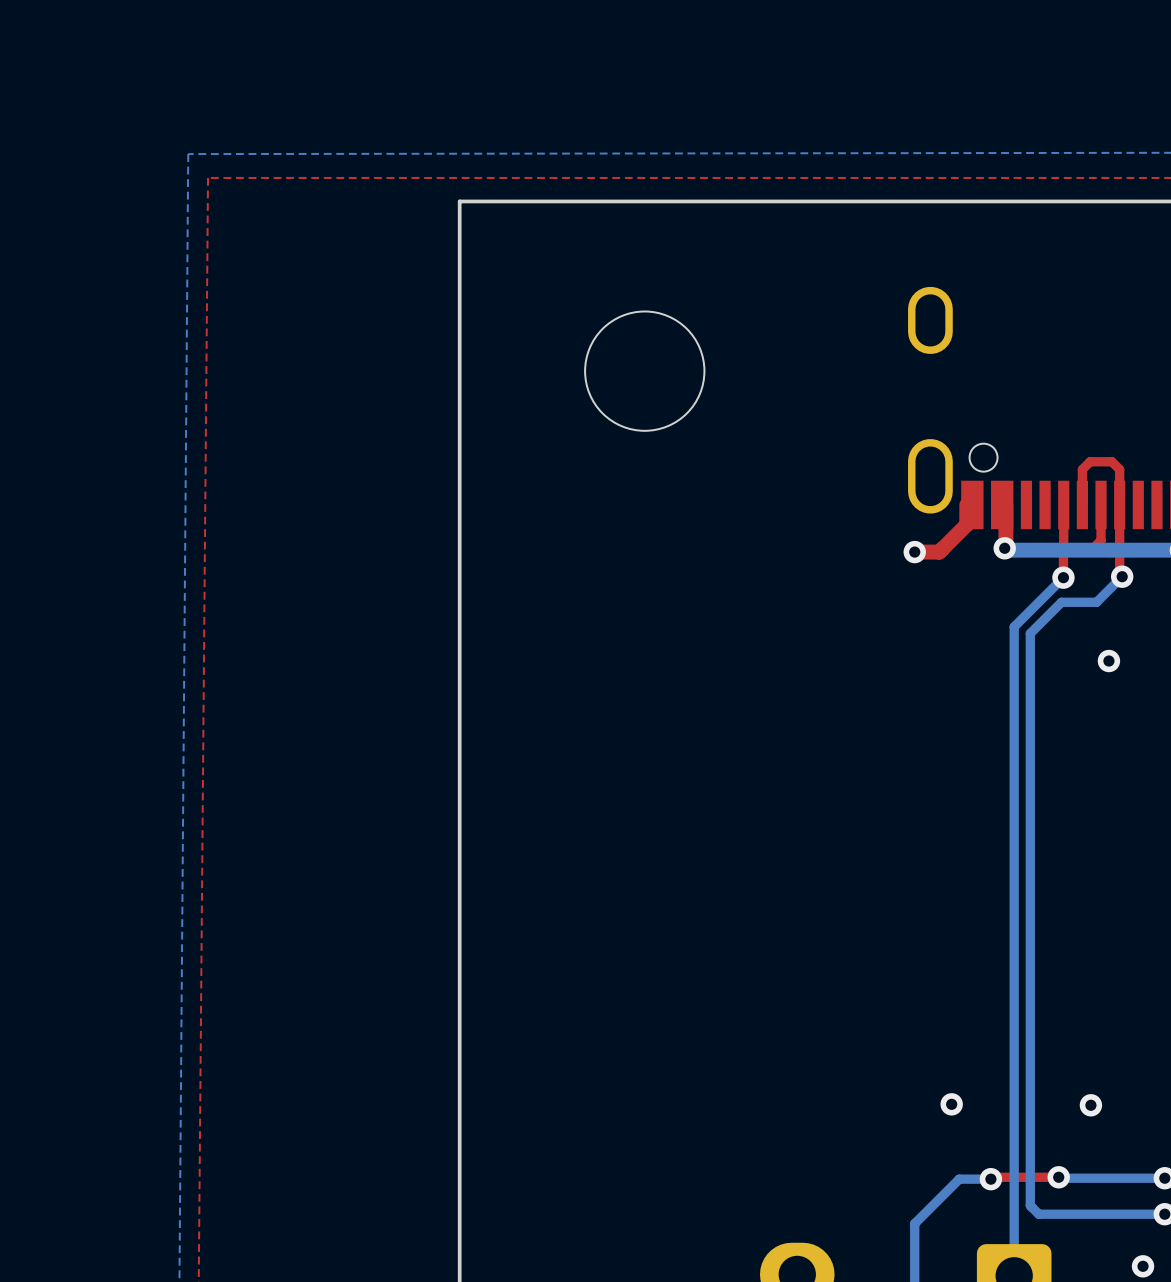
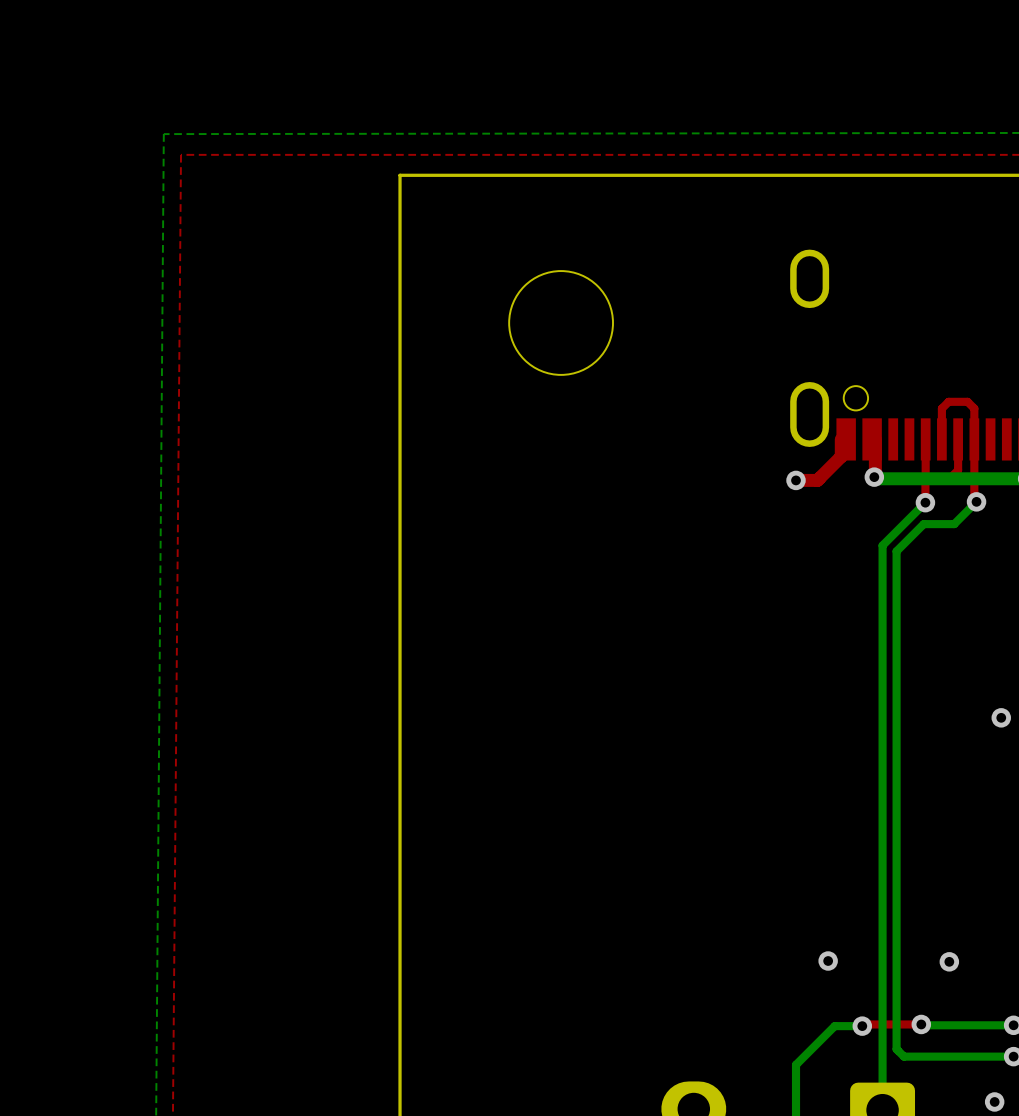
via position: (1108, 661) -> (1001, 717)

